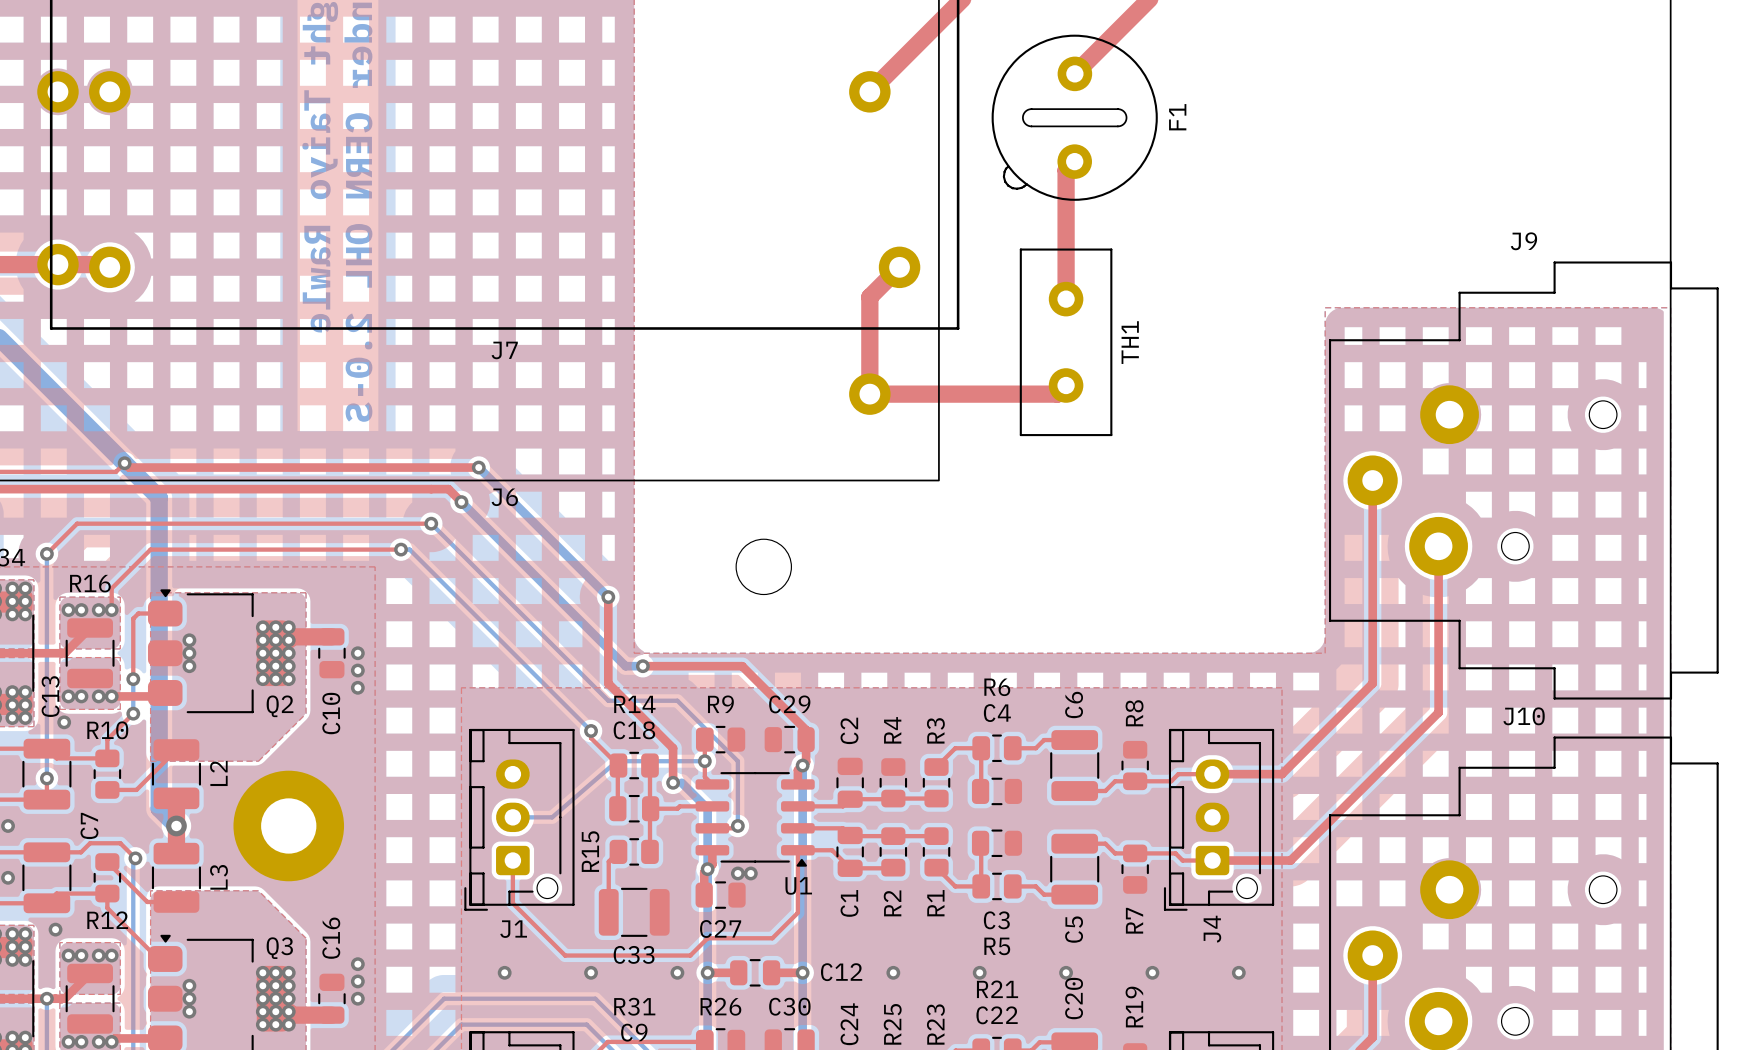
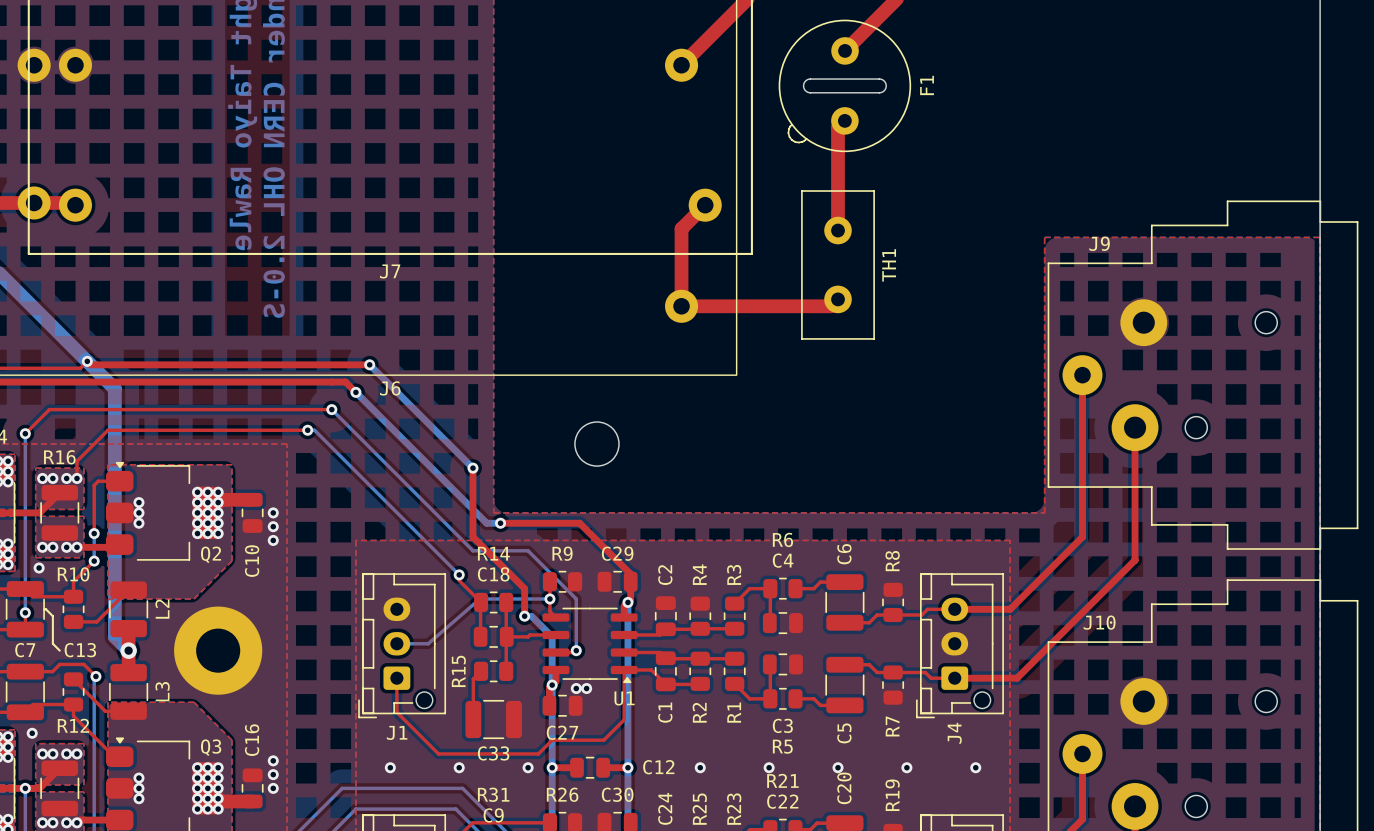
J9 name position: J9 (1523, 241) -> J9 (1099, 243)
C13 name rotation: 0° (50, 696) -> 90° clockwise (80, 650)
C13 name position: C13 (50, 696) -> C13 (80, 650)
J10 name position: J10 (1524, 716) -> J10 (1099, 622)
line: none -> (44, 609) (52, 616) (52, 643) (59, 650)
C7 name rotation: 0° (89, 825) -> 90° clockwise (25, 650)
C7 name position: C7 (89, 825) -> C7 (25, 650)

